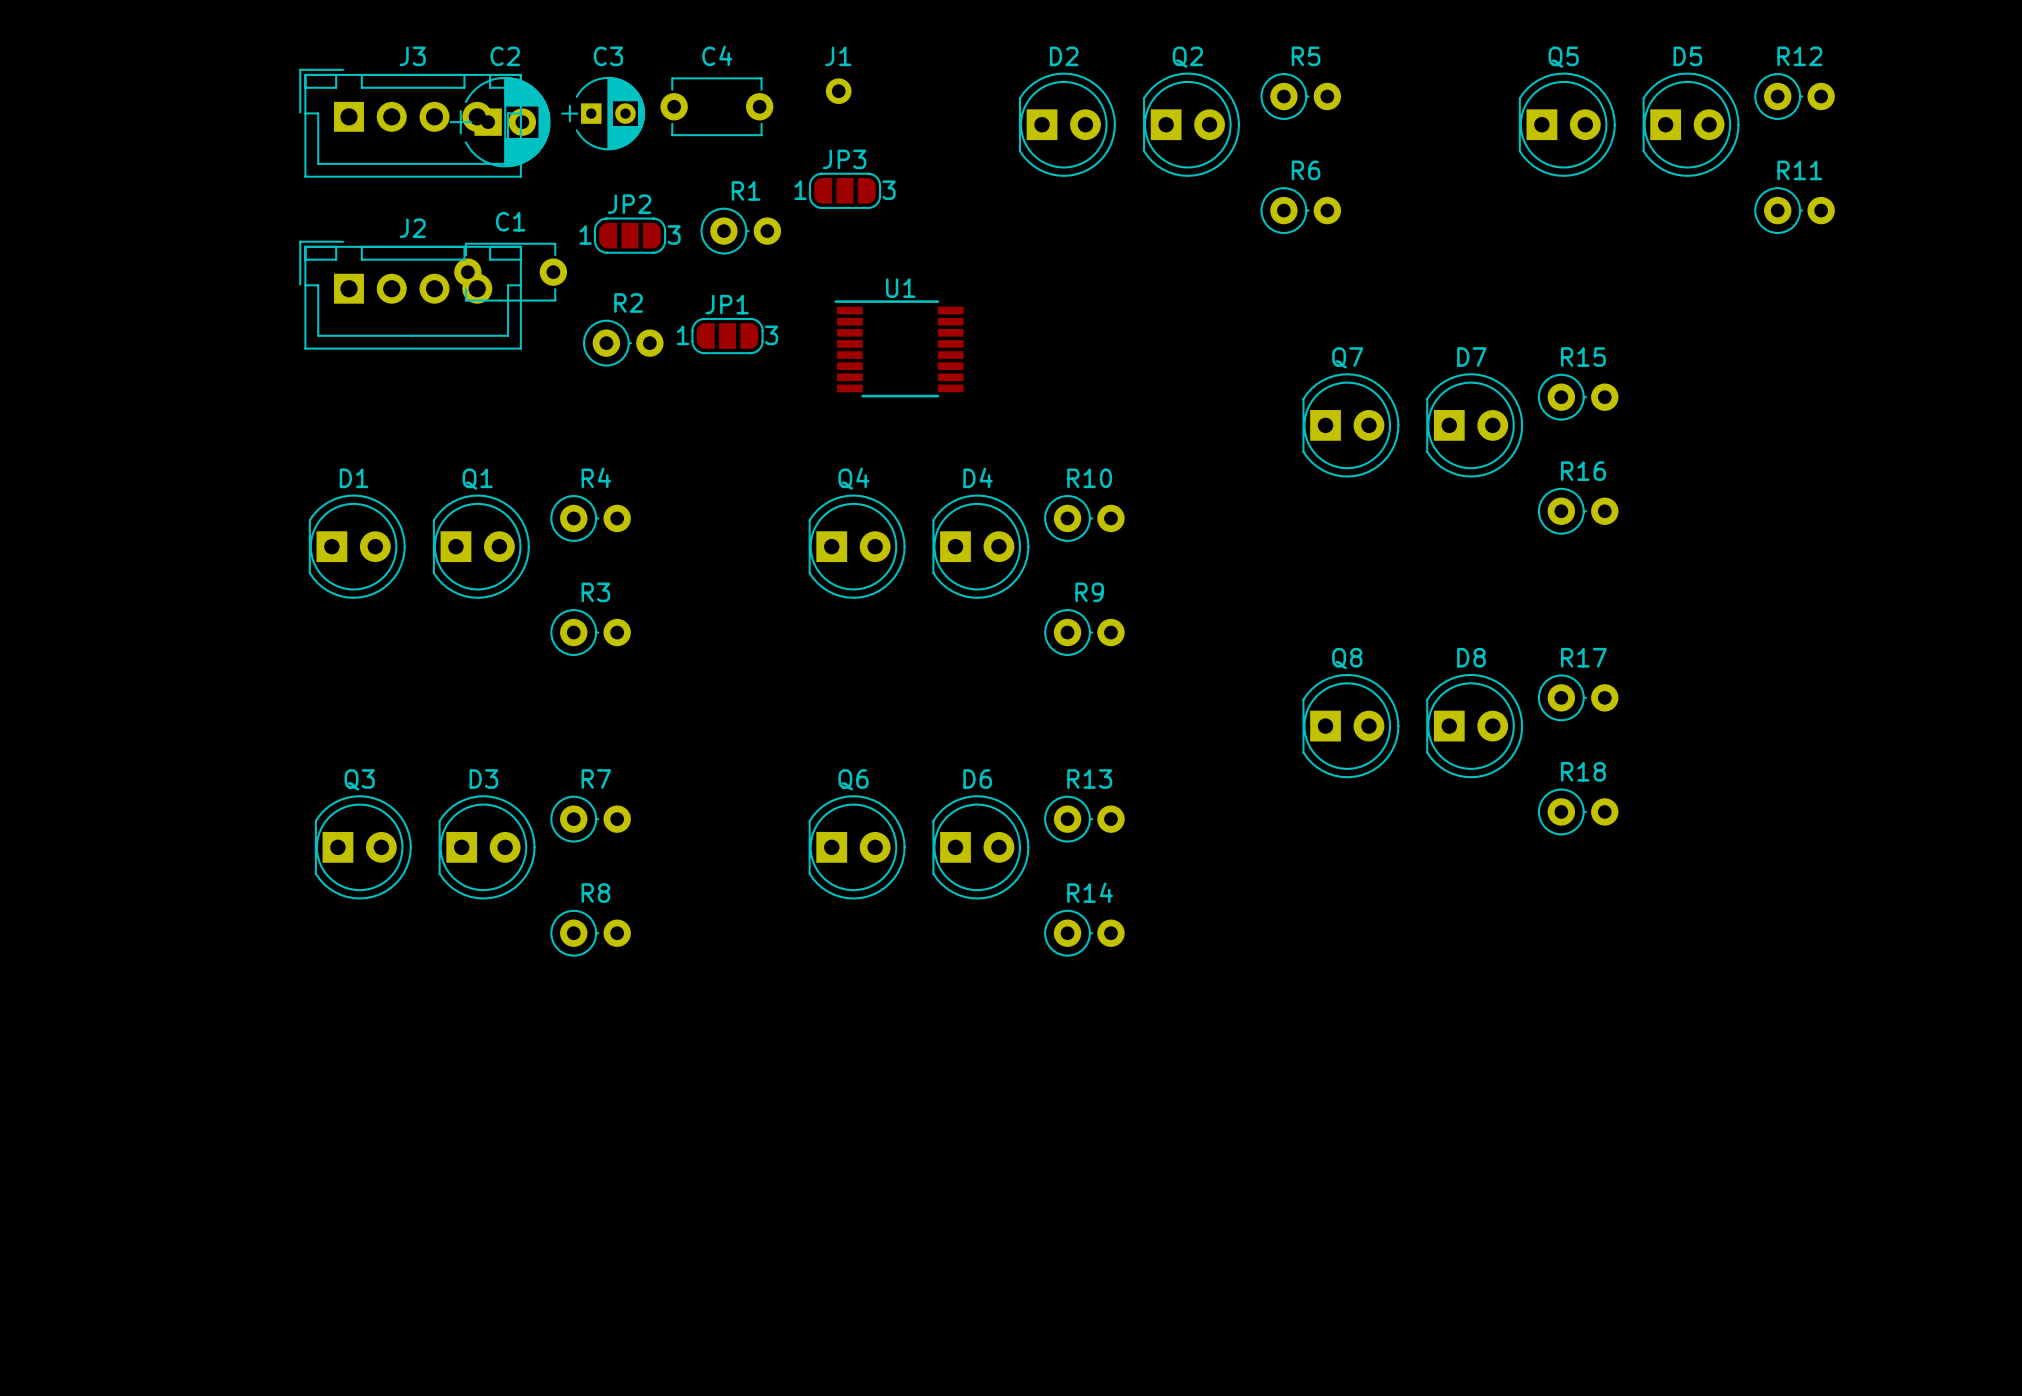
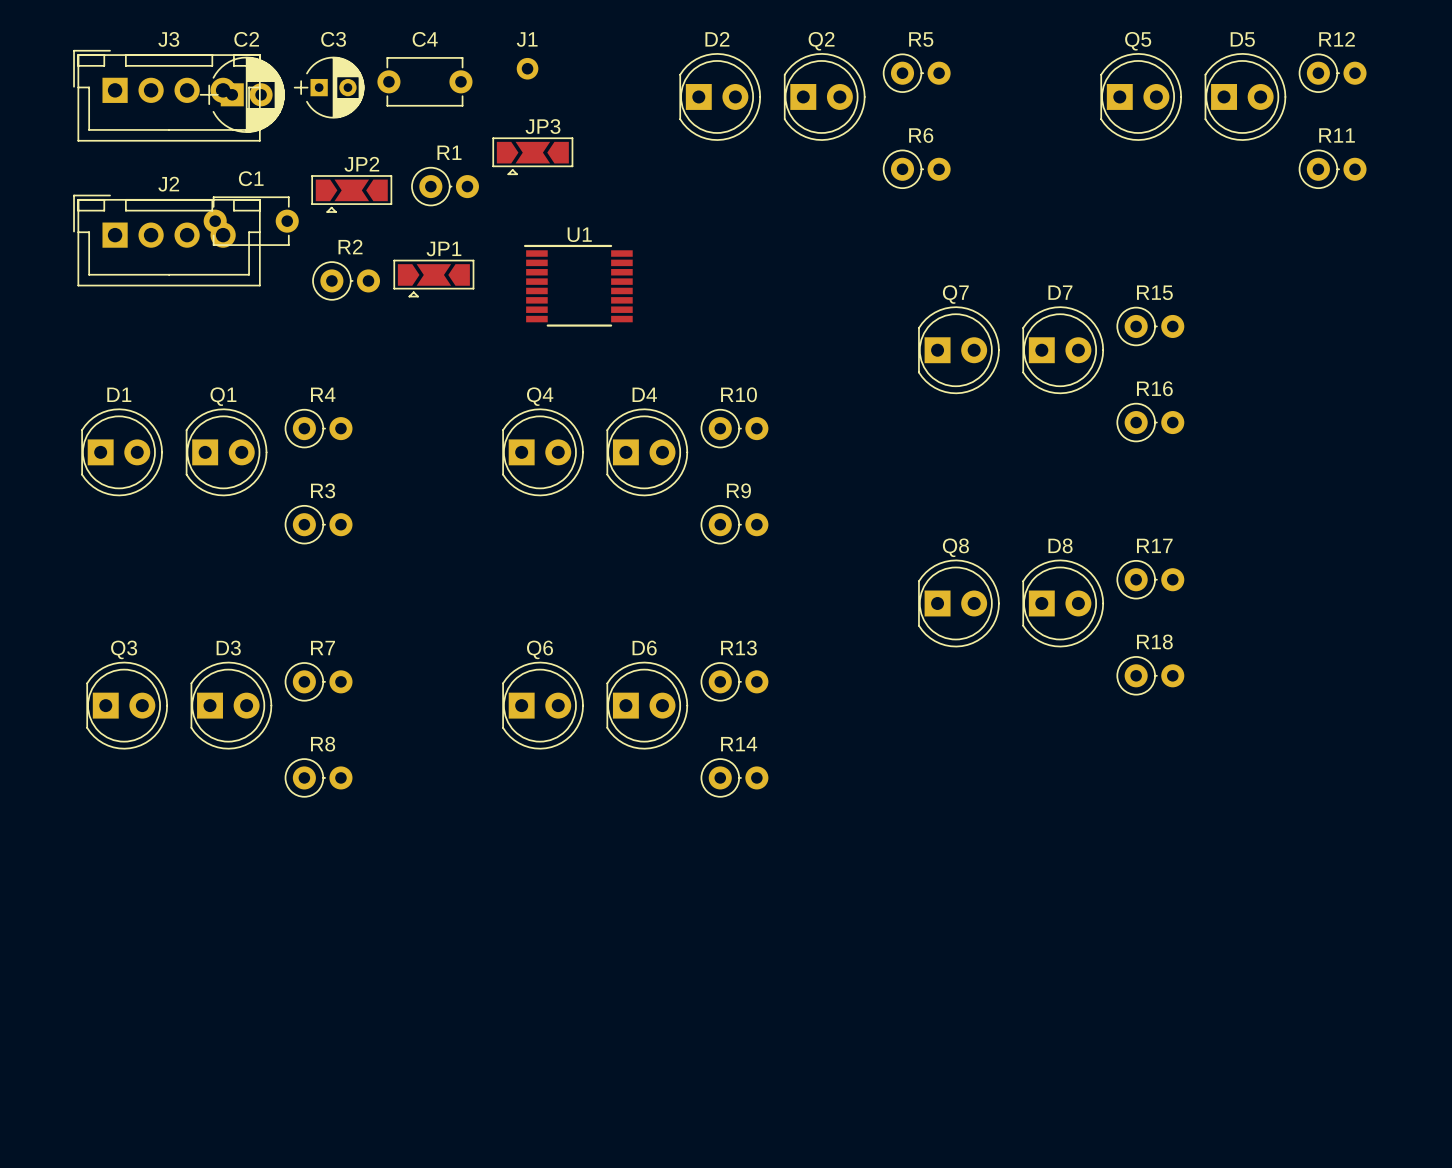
JP3 footprint: [808, 172, 882, 209] -> [492, 137, 574, 176]
JP2 footprint: [593, 217, 667, 254] -> [311, 175, 393, 213]
JP1 footprint: [691, 317, 764, 355] -> [393, 259, 475, 298]

